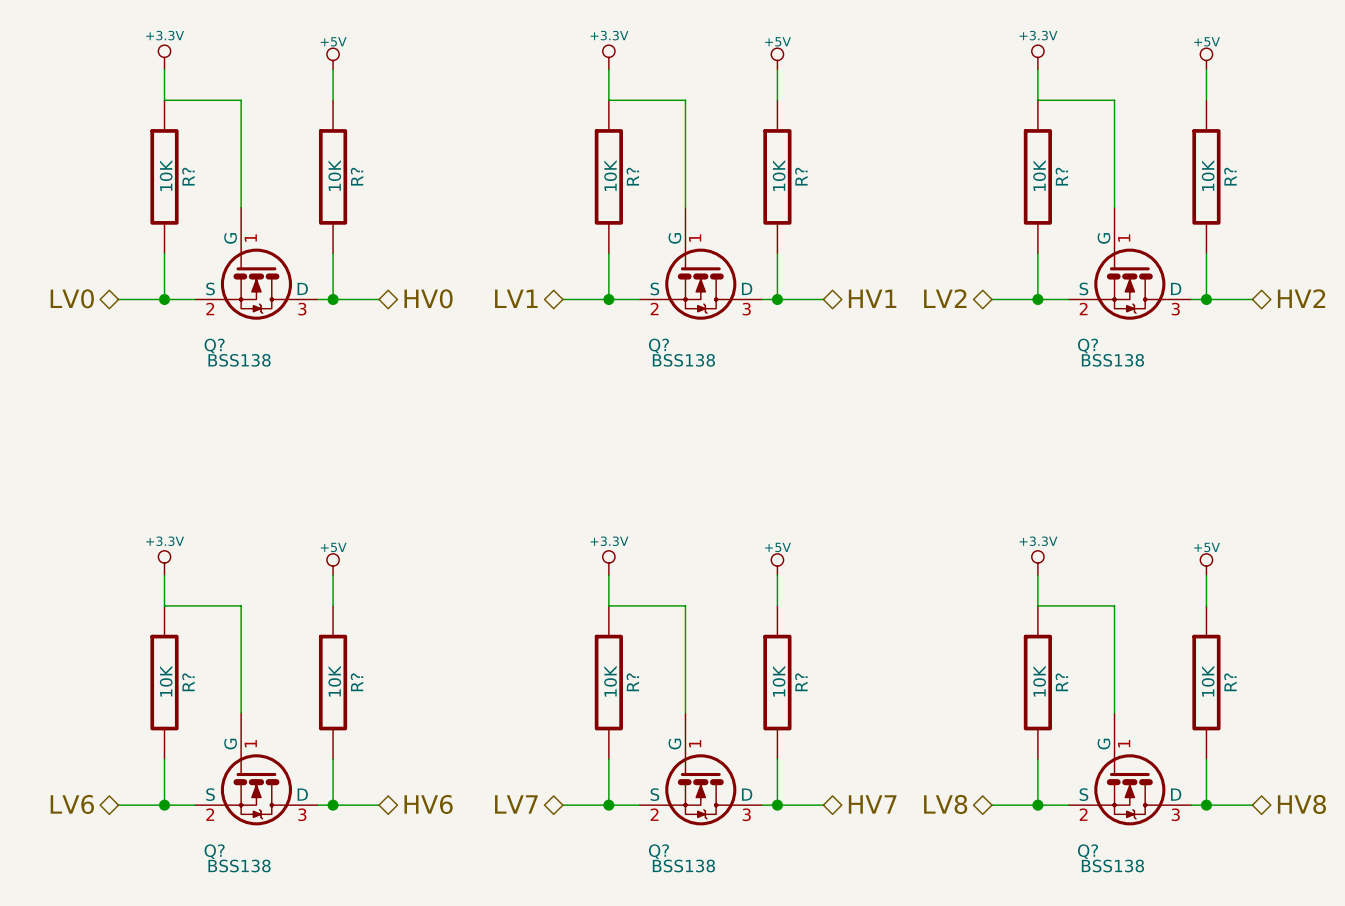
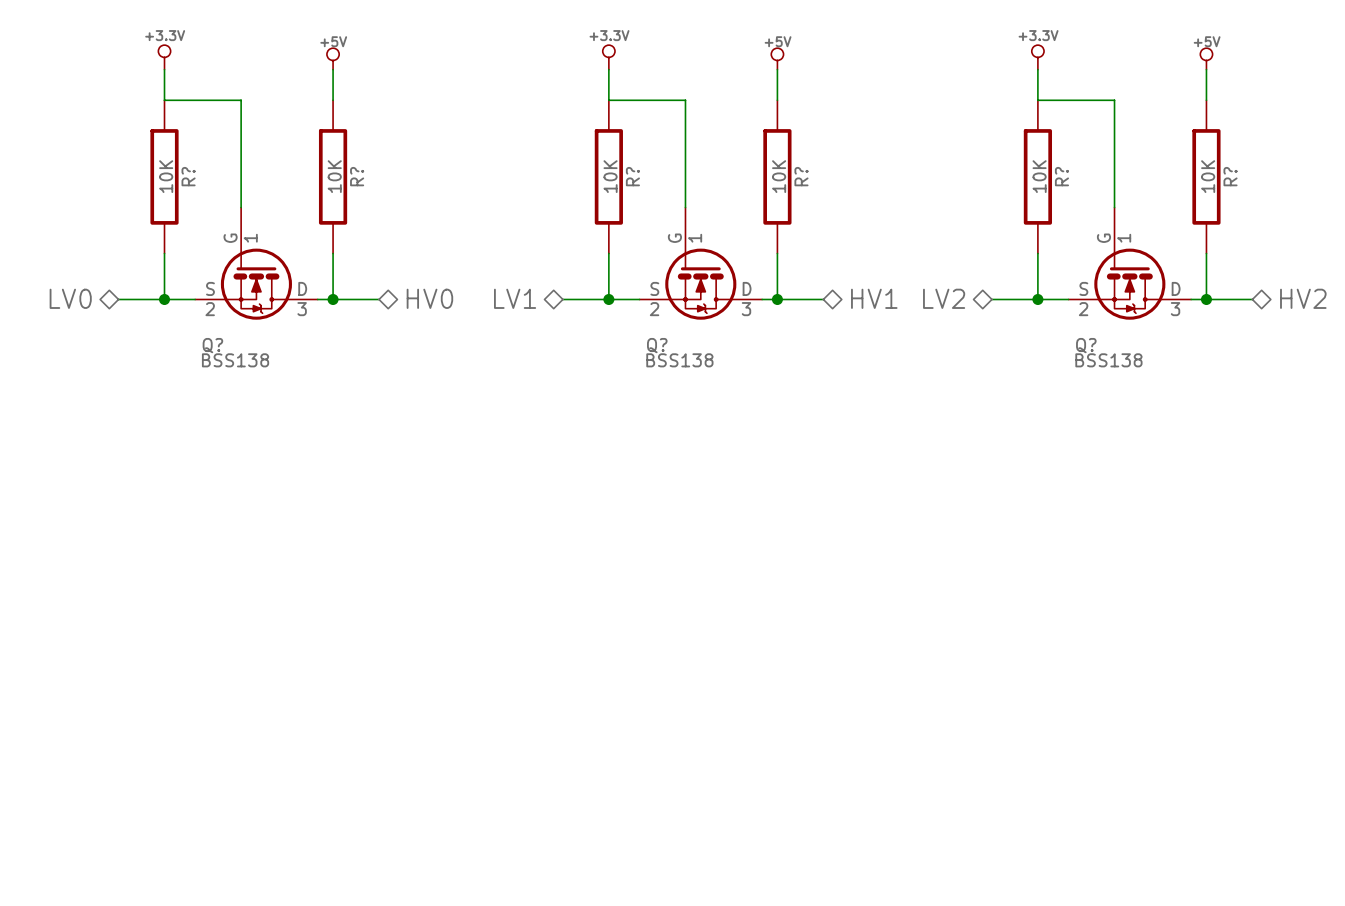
power symbol: +3.3V (164, 563) -> none
power symbol: +3.3V (608, 563) -> none
power symbol: +3.3V (1037, 563) -> none
power symbol: +5V (333, 564) -> none
power symbol: +5V (777, 564) -> none
power symbol: +5V (1206, 564) -> none
wire: (164, 575) (164, 605) (241, 605) (241, 713) -> none
wire: (333, 575) (333, 605) -> none
wire: (608, 575) (608, 605) (685, 605) (685, 713) -> none
wire: (777, 575) (777, 605) -> none
wire: (1037, 575) (1037, 605) (1114, 605) (1114, 713) -> none
wire: (1206, 575) (1206, 605) -> none
R?: 10K (164, 682) -> none
R?: 10K (333, 682) -> none
R?: 10K (608, 682) -> none
R?: 10K (777, 682) -> none
R?: 10K (1037, 682) -> none
R?: 10K (1206, 682) -> none
wire: (164, 759) (164, 805) -> none
wire: (333, 759) (333, 805) -> none
wire: (608, 759) (608, 805) -> none
wire: (777, 759) (777, 805) -> none
wire: (1037, 759) (1037, 805) -> none
wire: (1206, 759) (1206, 805) -> none
Q?: BSS138 (256, 769) -> none
Q?: BSS138 (700, 769) -> none
Q?: BSS138 (1129, 769) -> none
hierarchical label: LV6 (72, 804) -> none
hierarchical label: HV6 (428, 804) -> none
hierarchical label: LV7 (516, 804) -> none
hierarchical label: HV7 (872, 804) -> none
hierarchical label: LV8 (945, 804) -> none
hierarchical label: HV8 (1301, 804) -> none
wire: (118, 805) (195, 805) -> none
junction: (164, 805) -> none
wire: (317, 805) (379, 805) -> none
junction: (333, 805) -> none
wire: (562, 805) (639, 805) -> none
junction: (608, 805) -> none
wire: (762, 805) (823, 805) -> none
junction: (777, 805) -> none
wire: (991, 805) (1068, 805) -> none
junction: (1037, 805) -> none
wire: (1191, 805) (1252, 805) -> none
junction: (1206, 805) -> none

